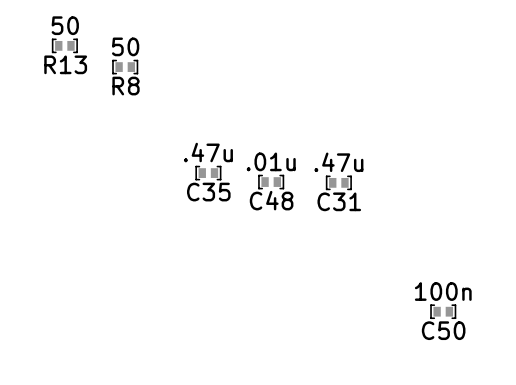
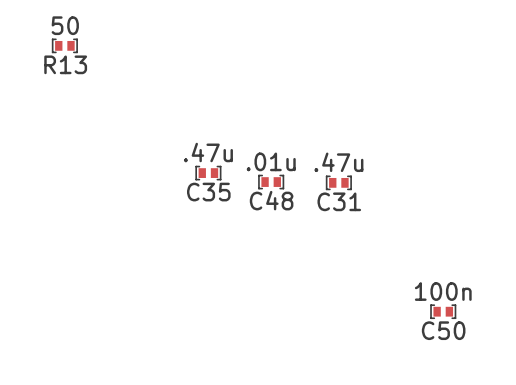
R8: 50 (125, 67) -> none

